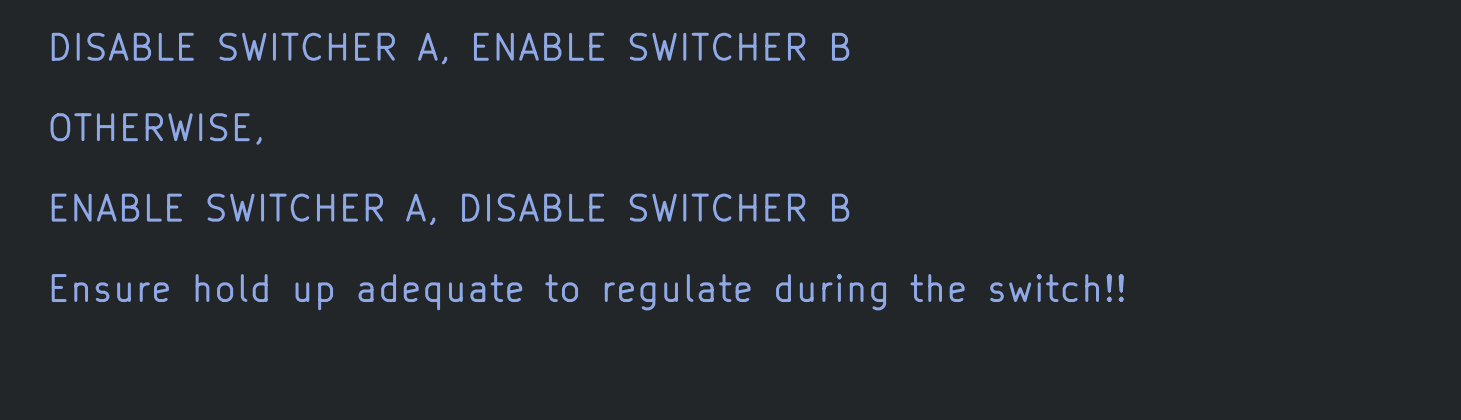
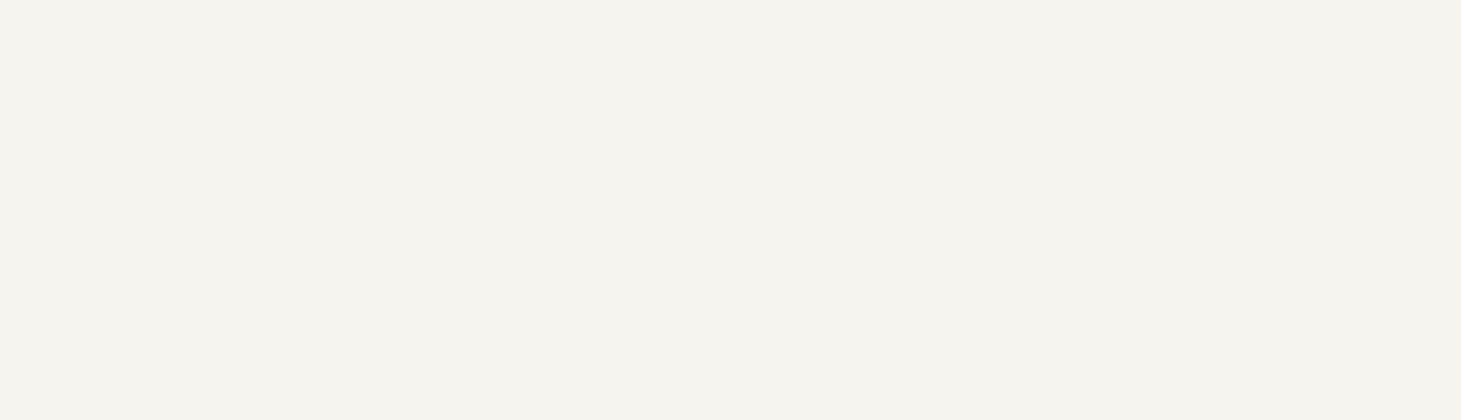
text: DISABLE SWITCHER A, ENABLE SWITCHER B (450, 48) -> none
text: OTHERWISE, (156, 128) -> none
text: ENABLE SWITCHER A, DISABLE SWITCHER B (450, 209) -> none
text: Ensure hold up adequate to regulate during the switch!! (587, 292) -> none

